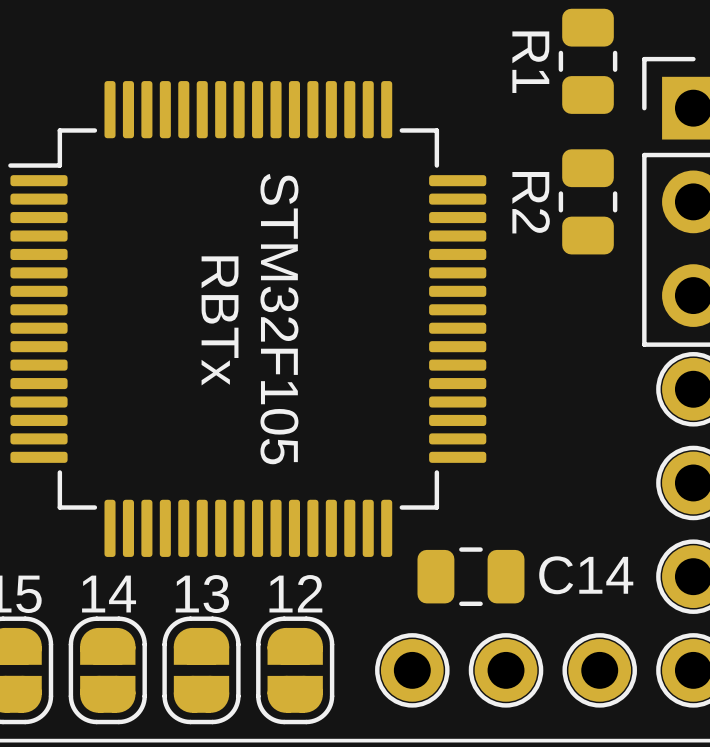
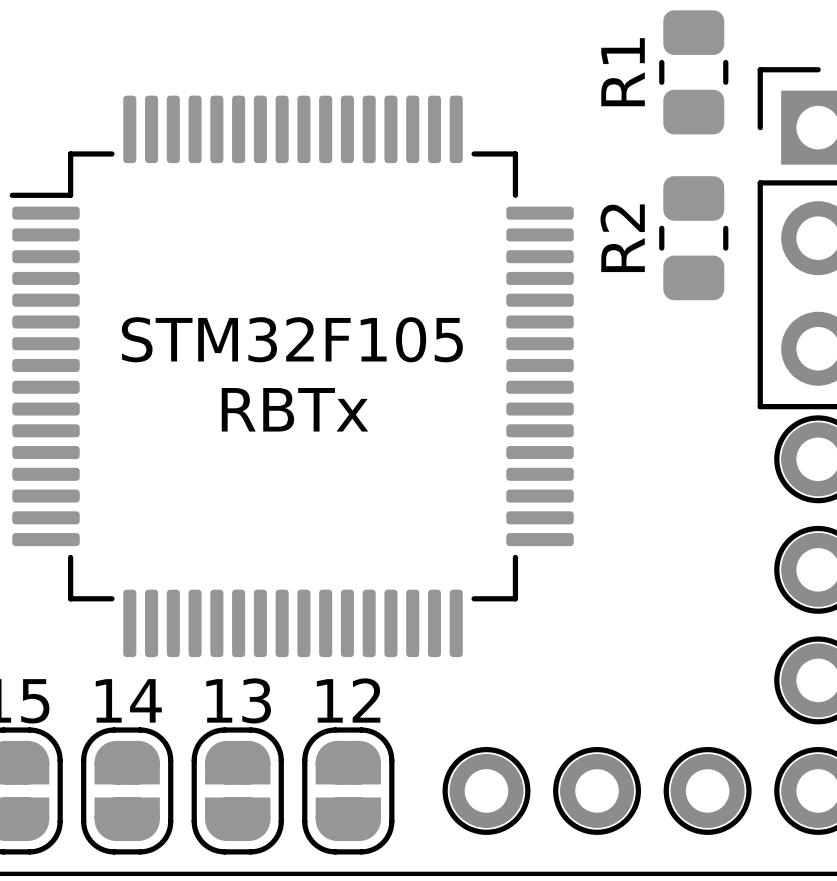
R1 name rotation: 0° (530, 62) -> 180° (623, 72)
R2 name rotation: 0° (531, 202) -> 180° (622, 238)
text rotation: 0° (279, 319) -> 90° counterclockwise (292, 339)
text rotation: 0° (220, 320) -> 90° counterclockwise (294, 409)
C14: (470, 576) -> none

